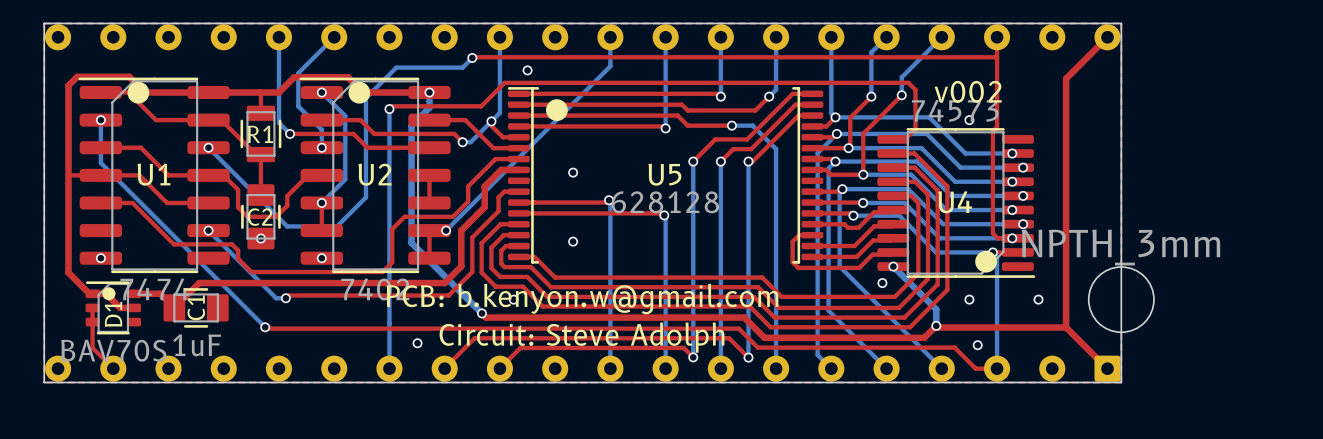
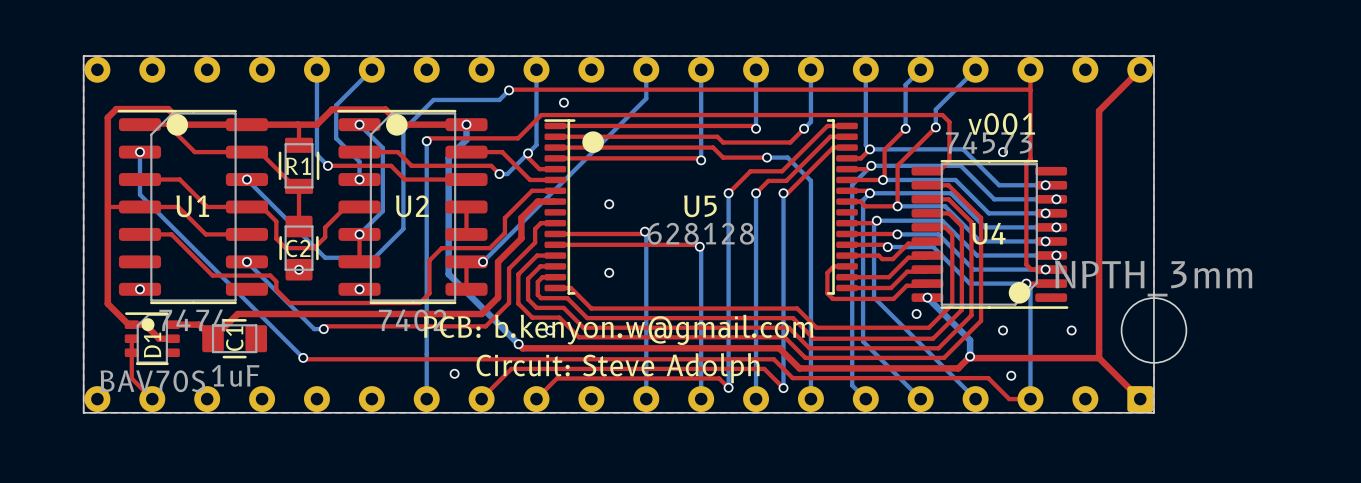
text: v002 (968, 91) -> v001 (1001, 123)

